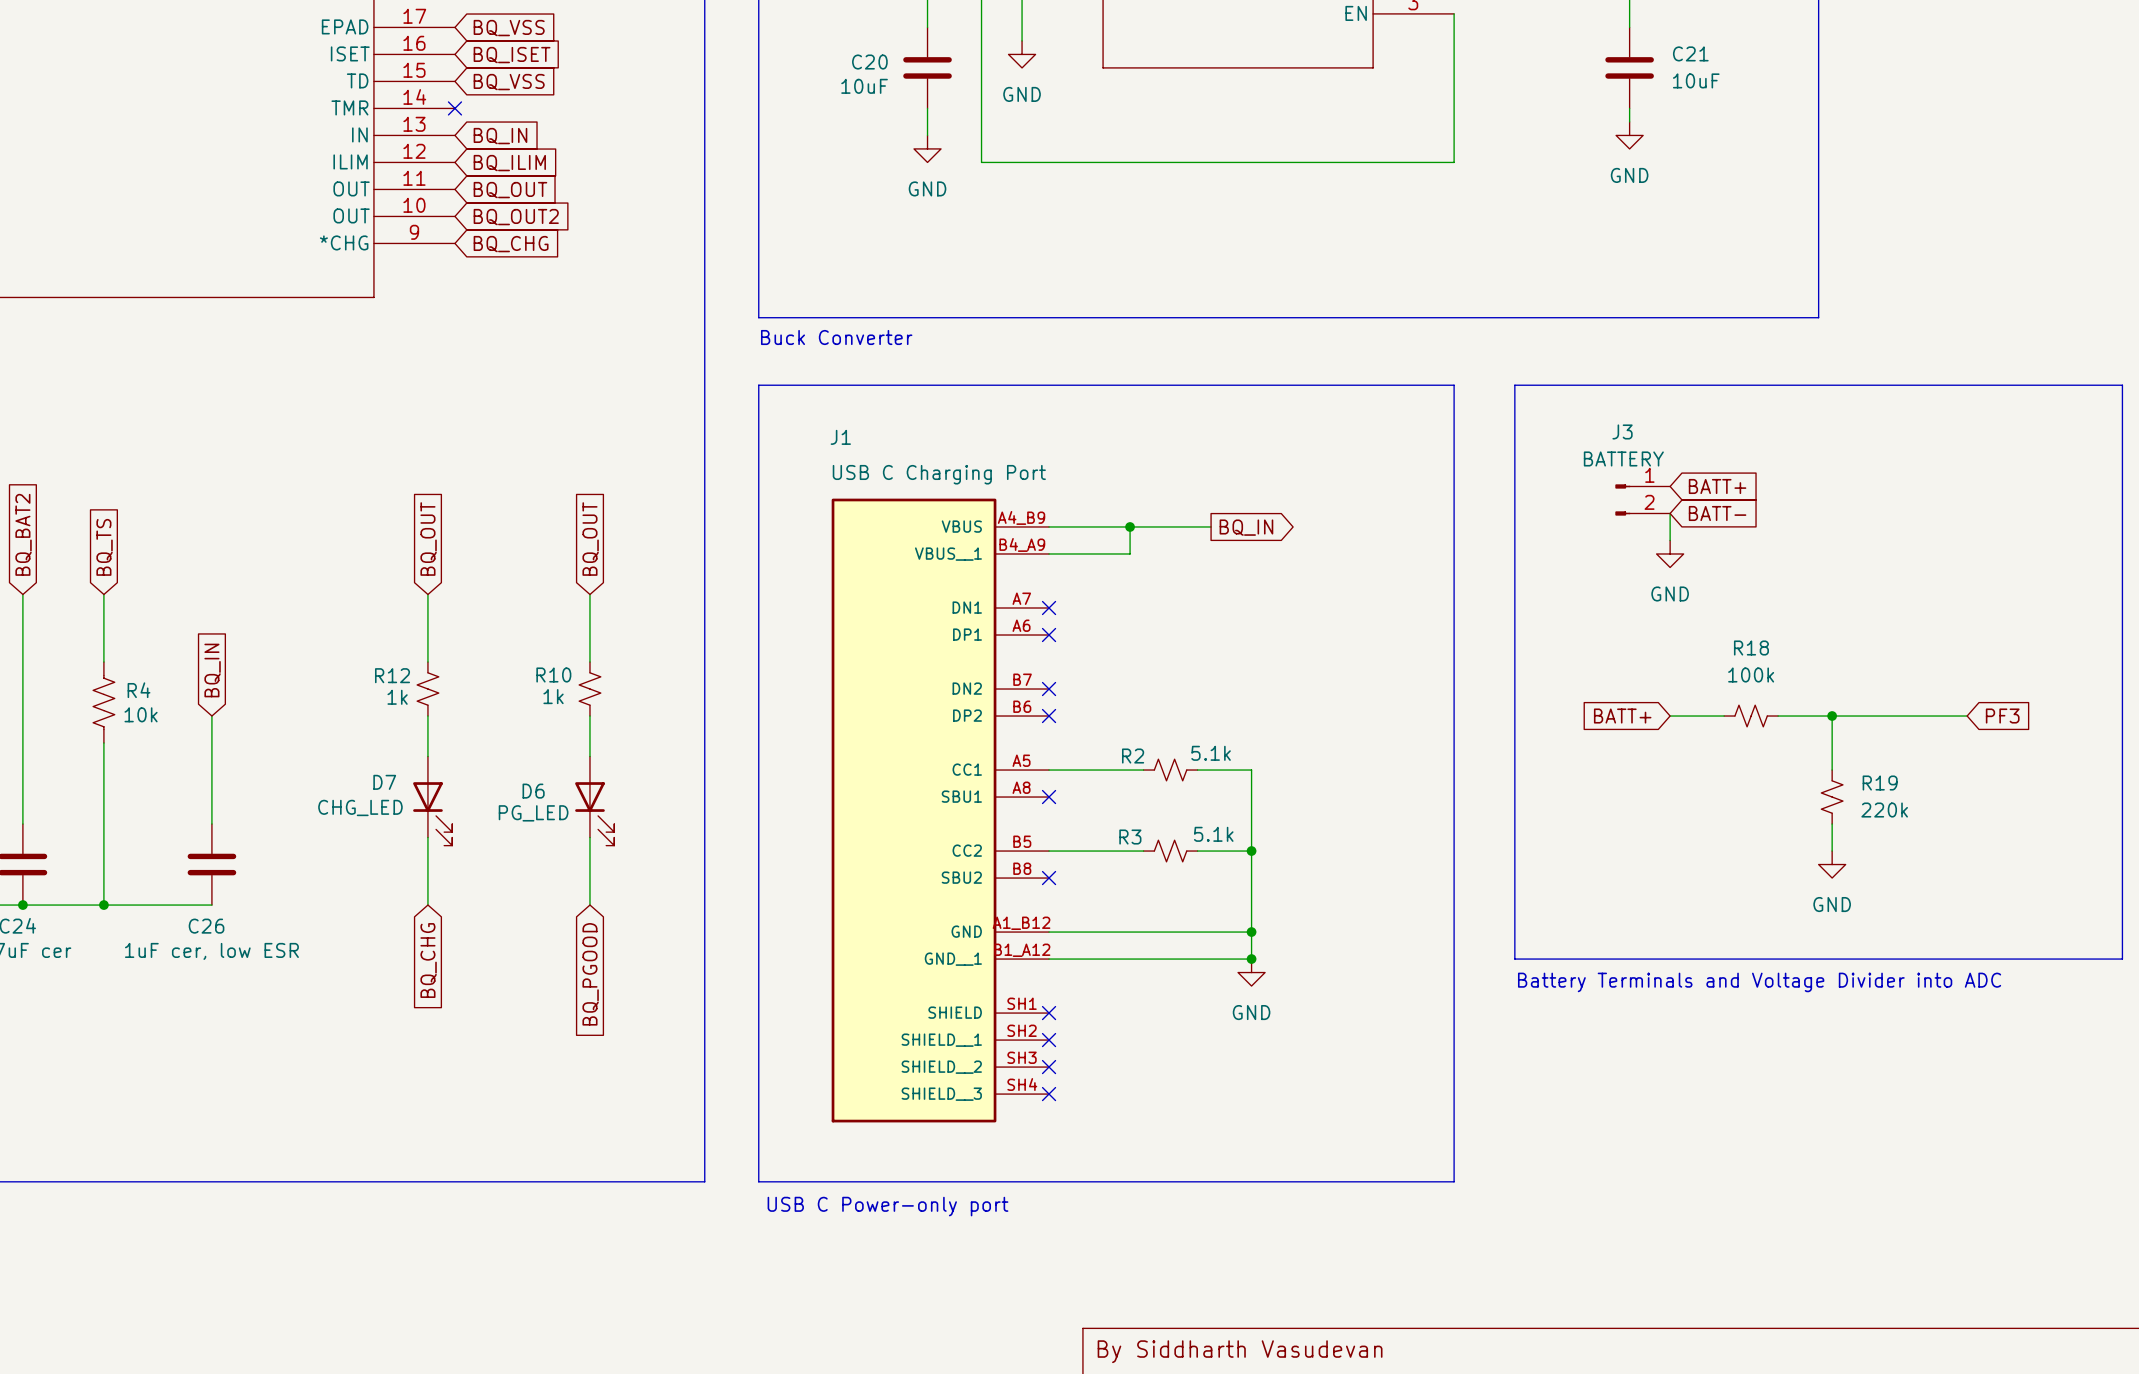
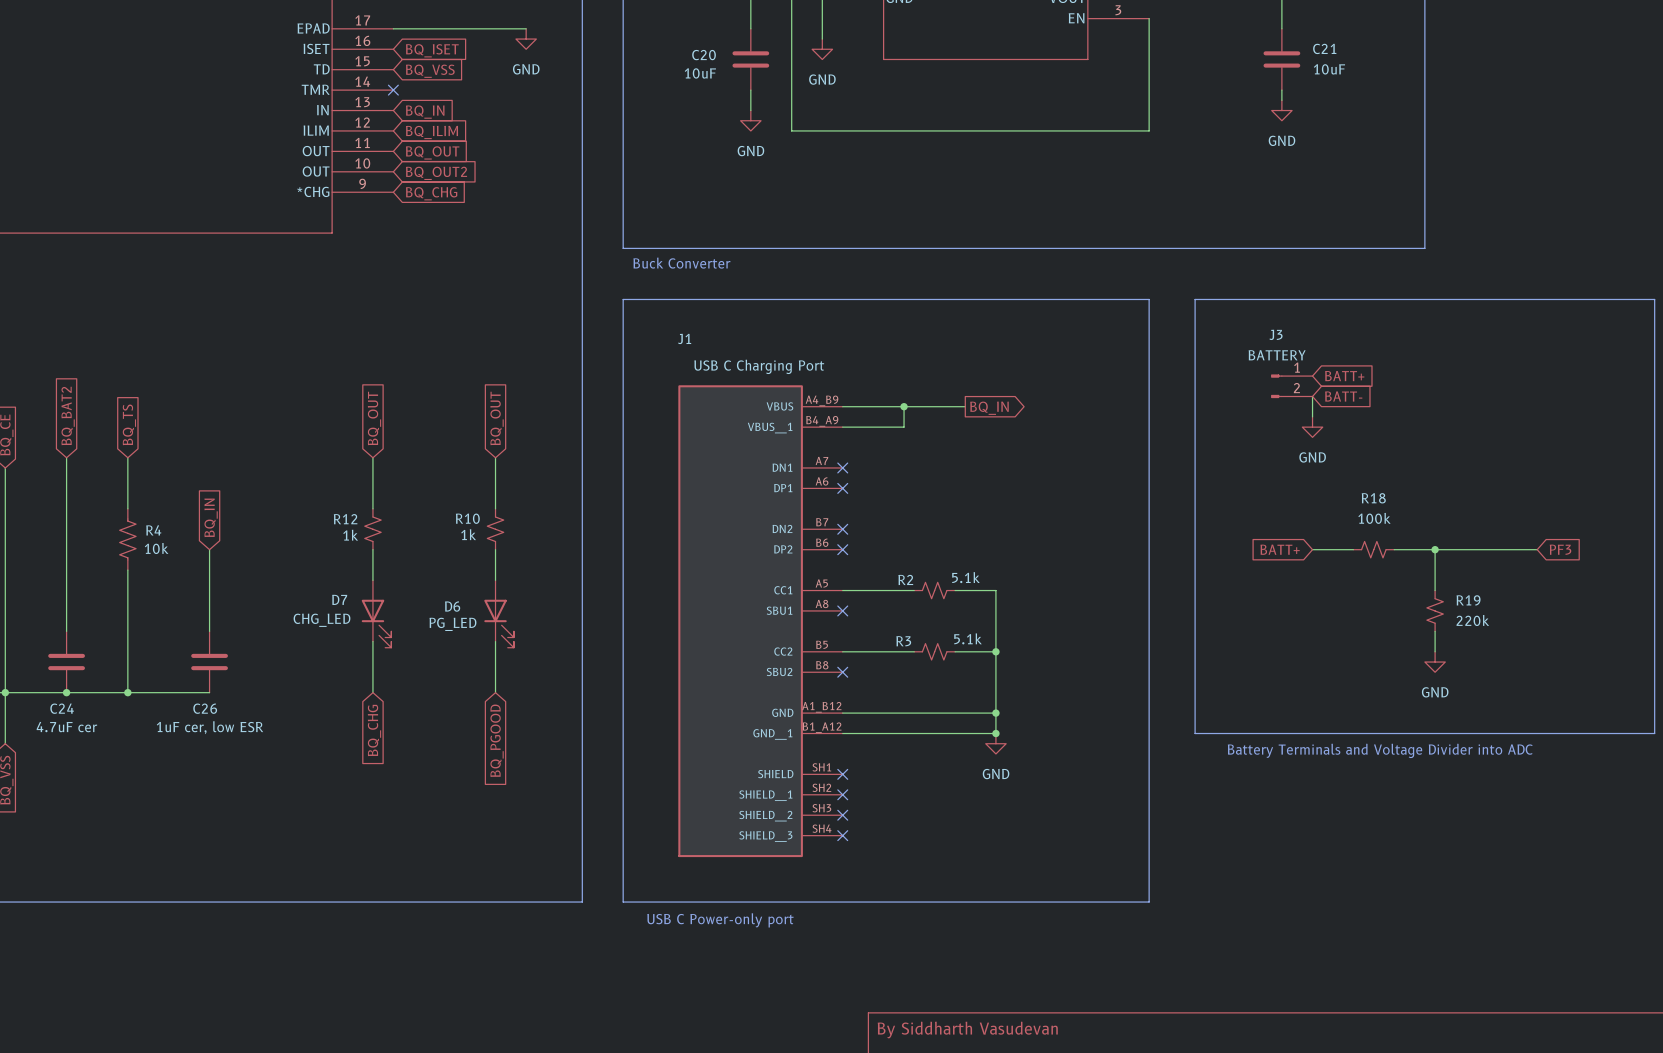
wire: none -> (393, 28) (526, 28)
global label: BQ_VSS (509, 28) -> none
power symbol: none -> GND (526, 39)

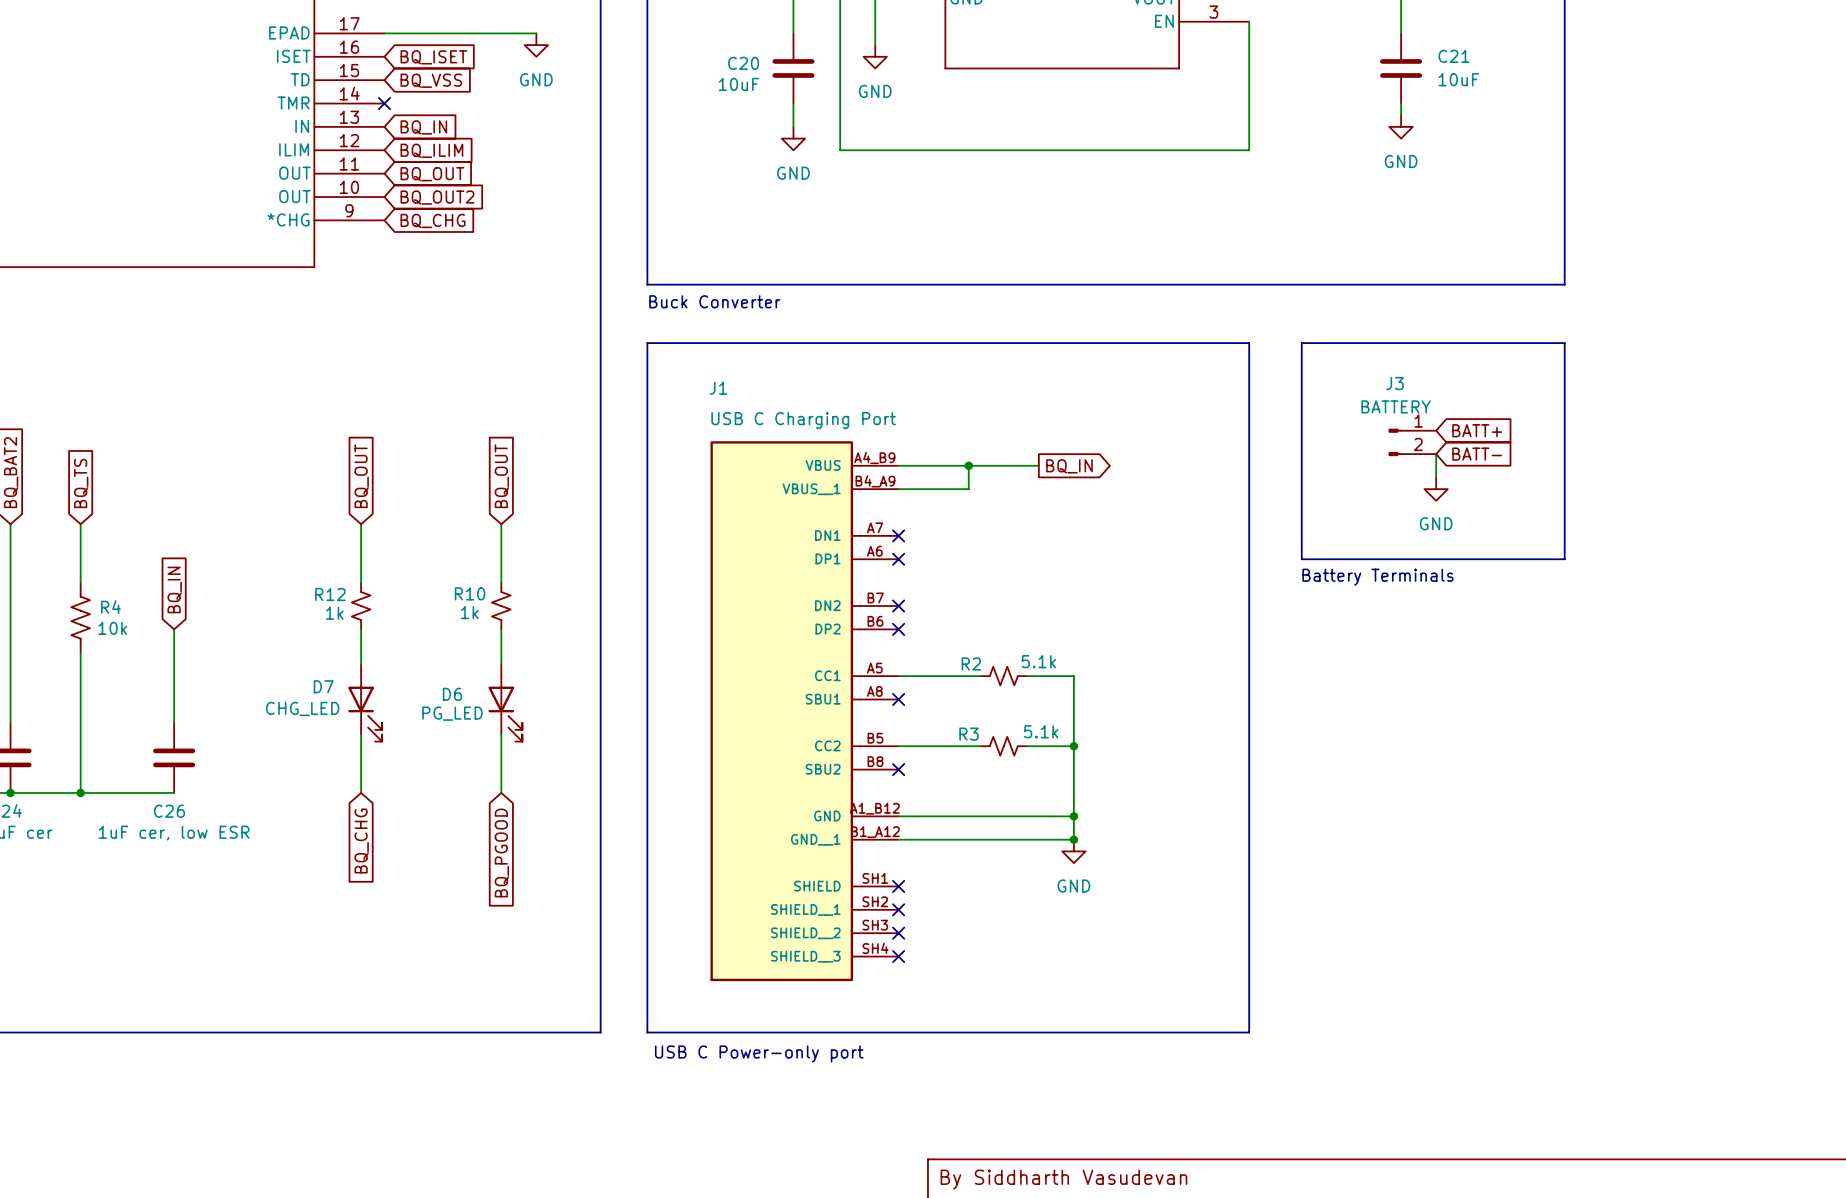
line: (1424, 299) (1654, 299) (1654, 733) (1195, 733) (1195, 488) -> (1564, 343) (1564, 559) (1301, 559)
text: none -> Battery Terminals (1378, 577)
global label: BATT+ (1280, 549) -> none
wire: (1312, 549) (1353, 549) -> none
R18: 100k (1373, 549) -> none
wire: (1394, 549) (1537, 549) -> none
wire: (1435, 549) (1435, 590) -> none
junction: (1435, 549) -> none
global label: PF3 (1560, 549) -> none
R19: 220k (1435, 610) -> none
wire: (1435, 631) (1435, 651) -> none
power symbol: GND (1435, 662) -> none
text: Battery Terminals and Voltage Divider into ADC (1380, 750) -> none

